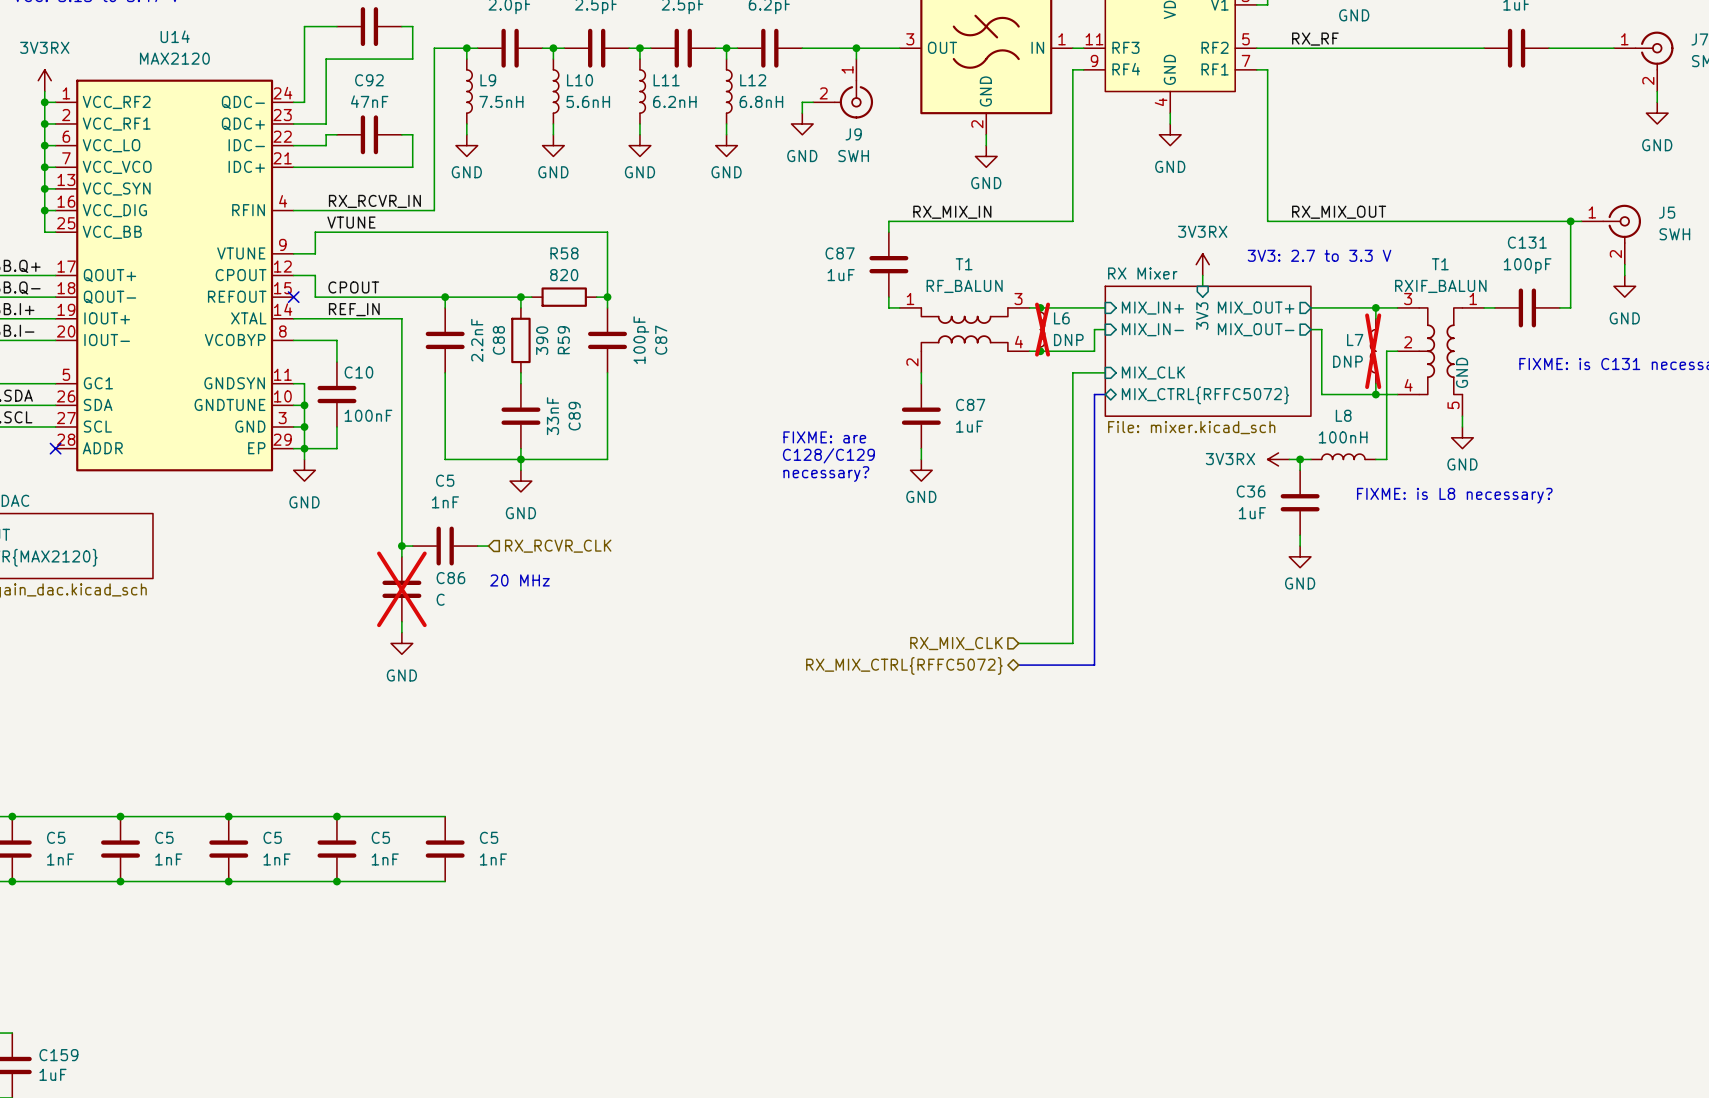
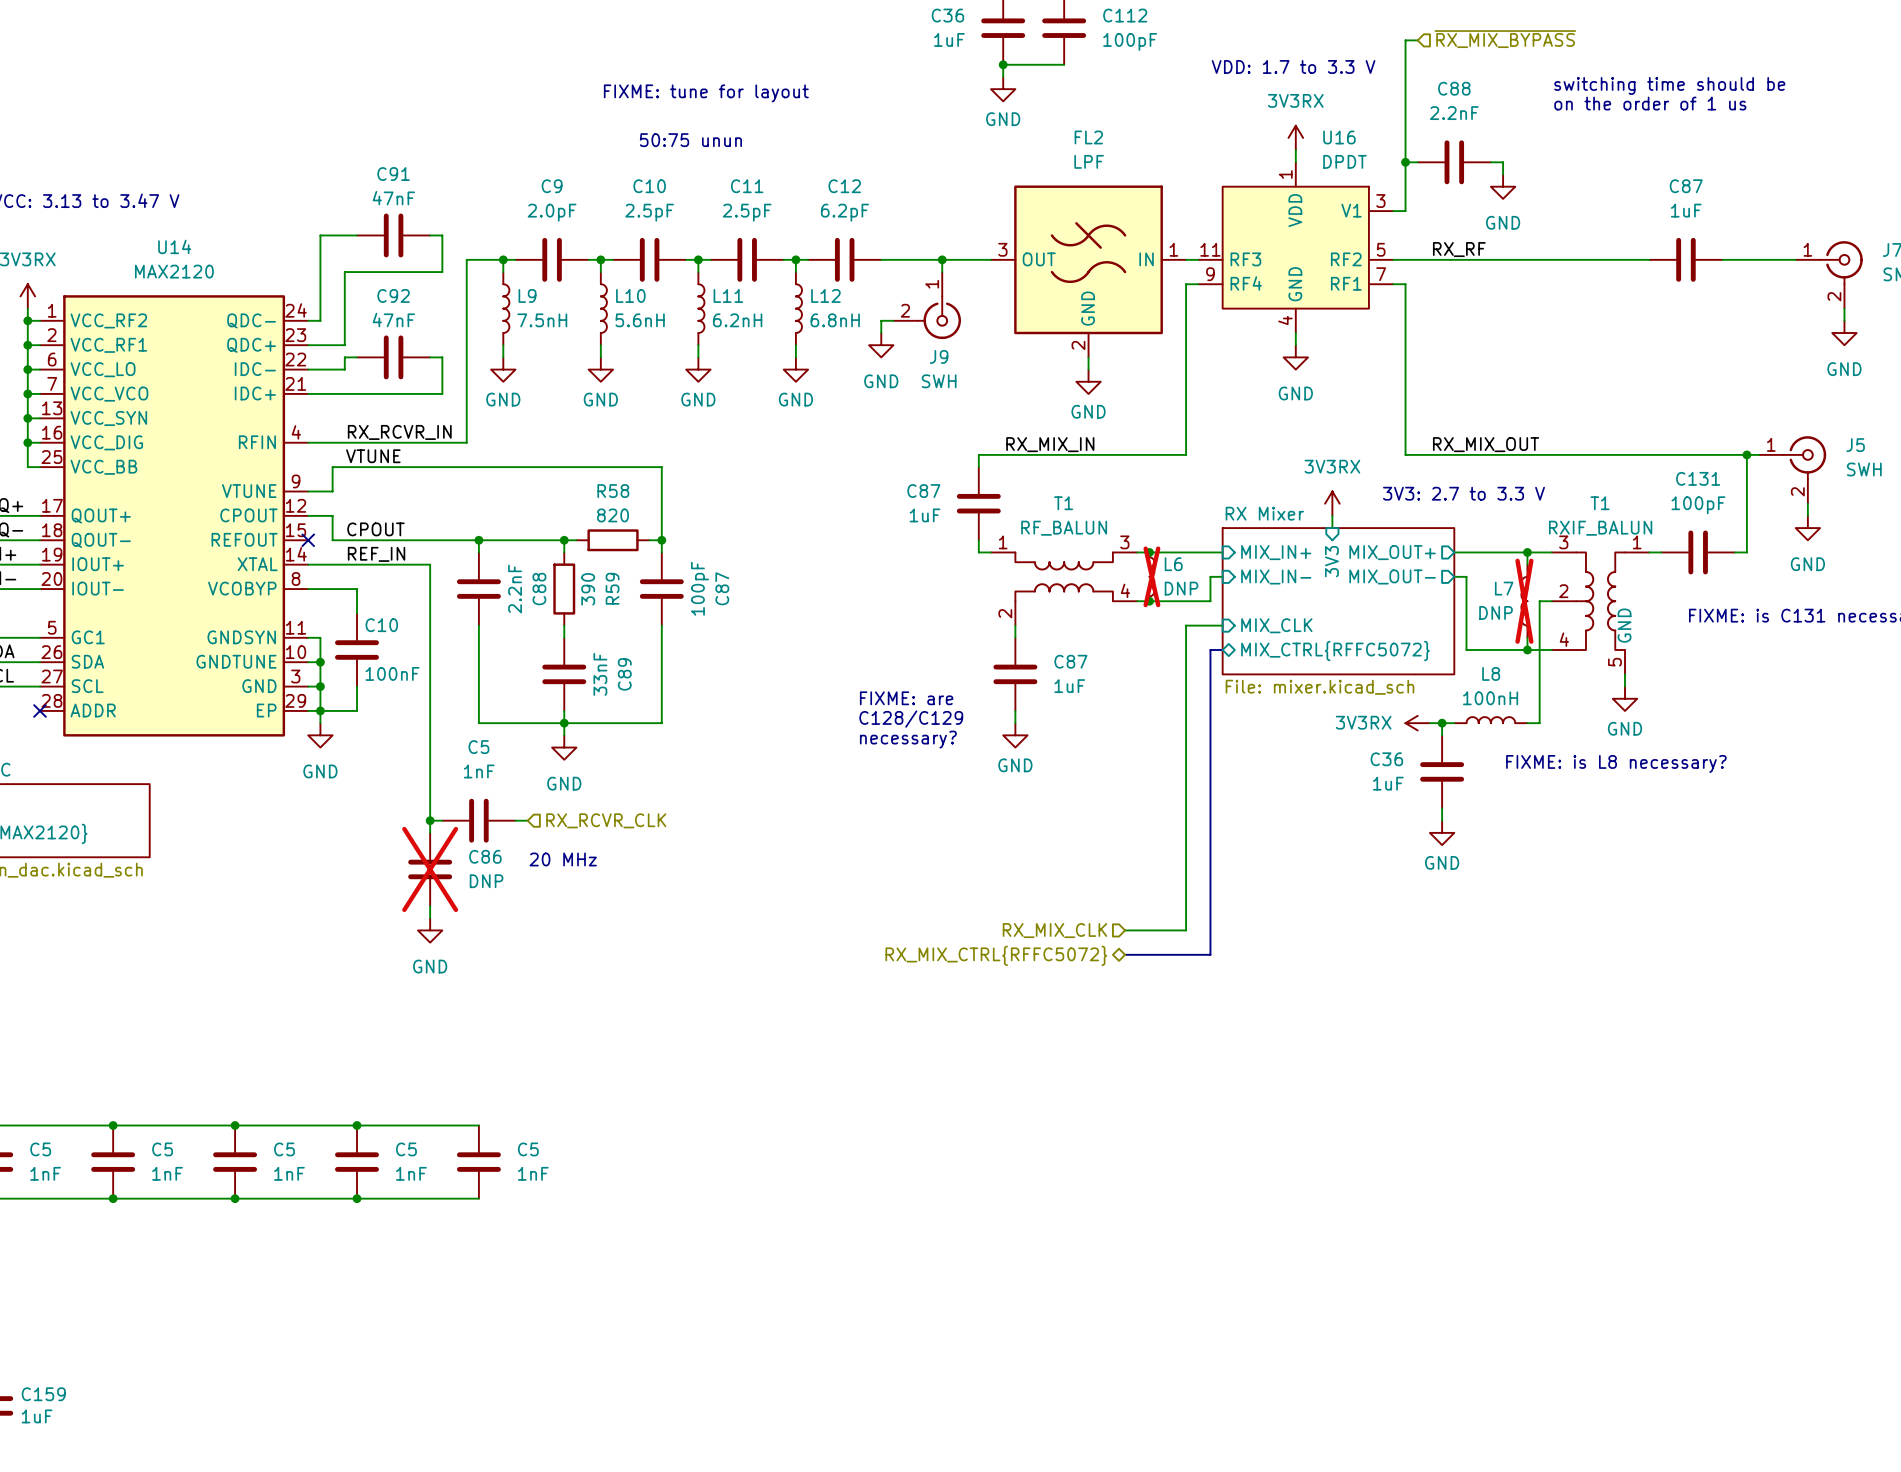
C86 value: C (440, 599) -> DNP (486, 881)

